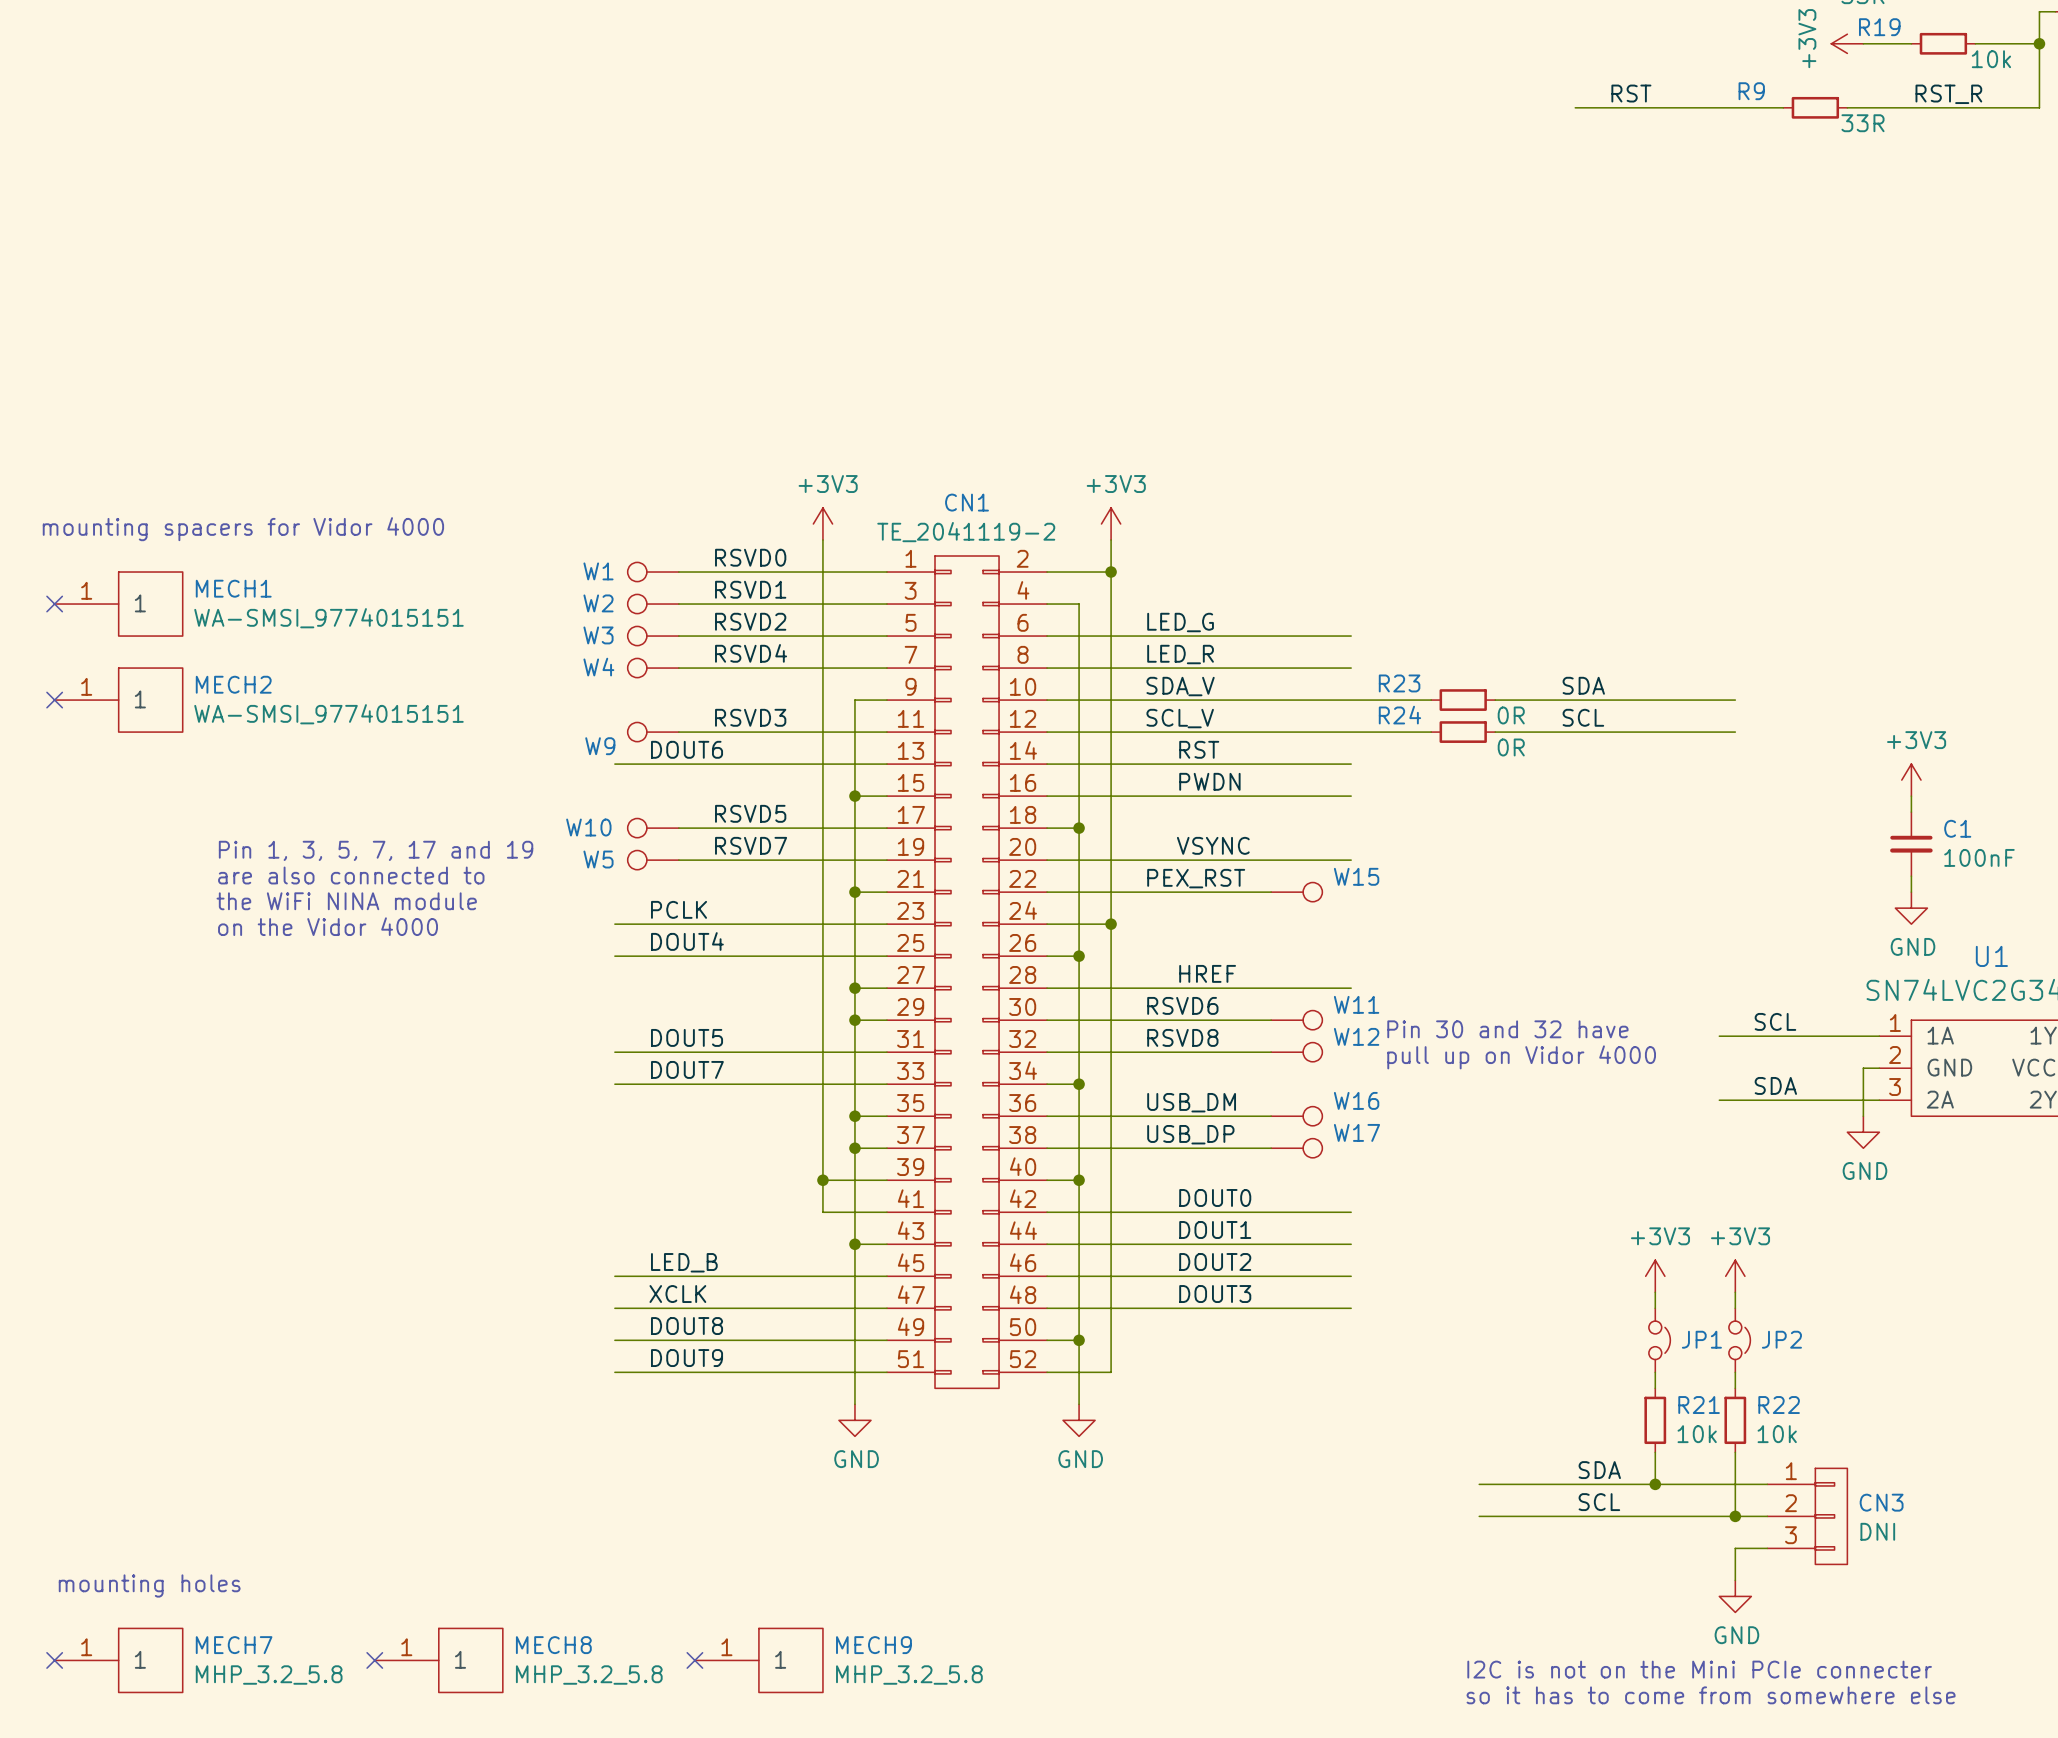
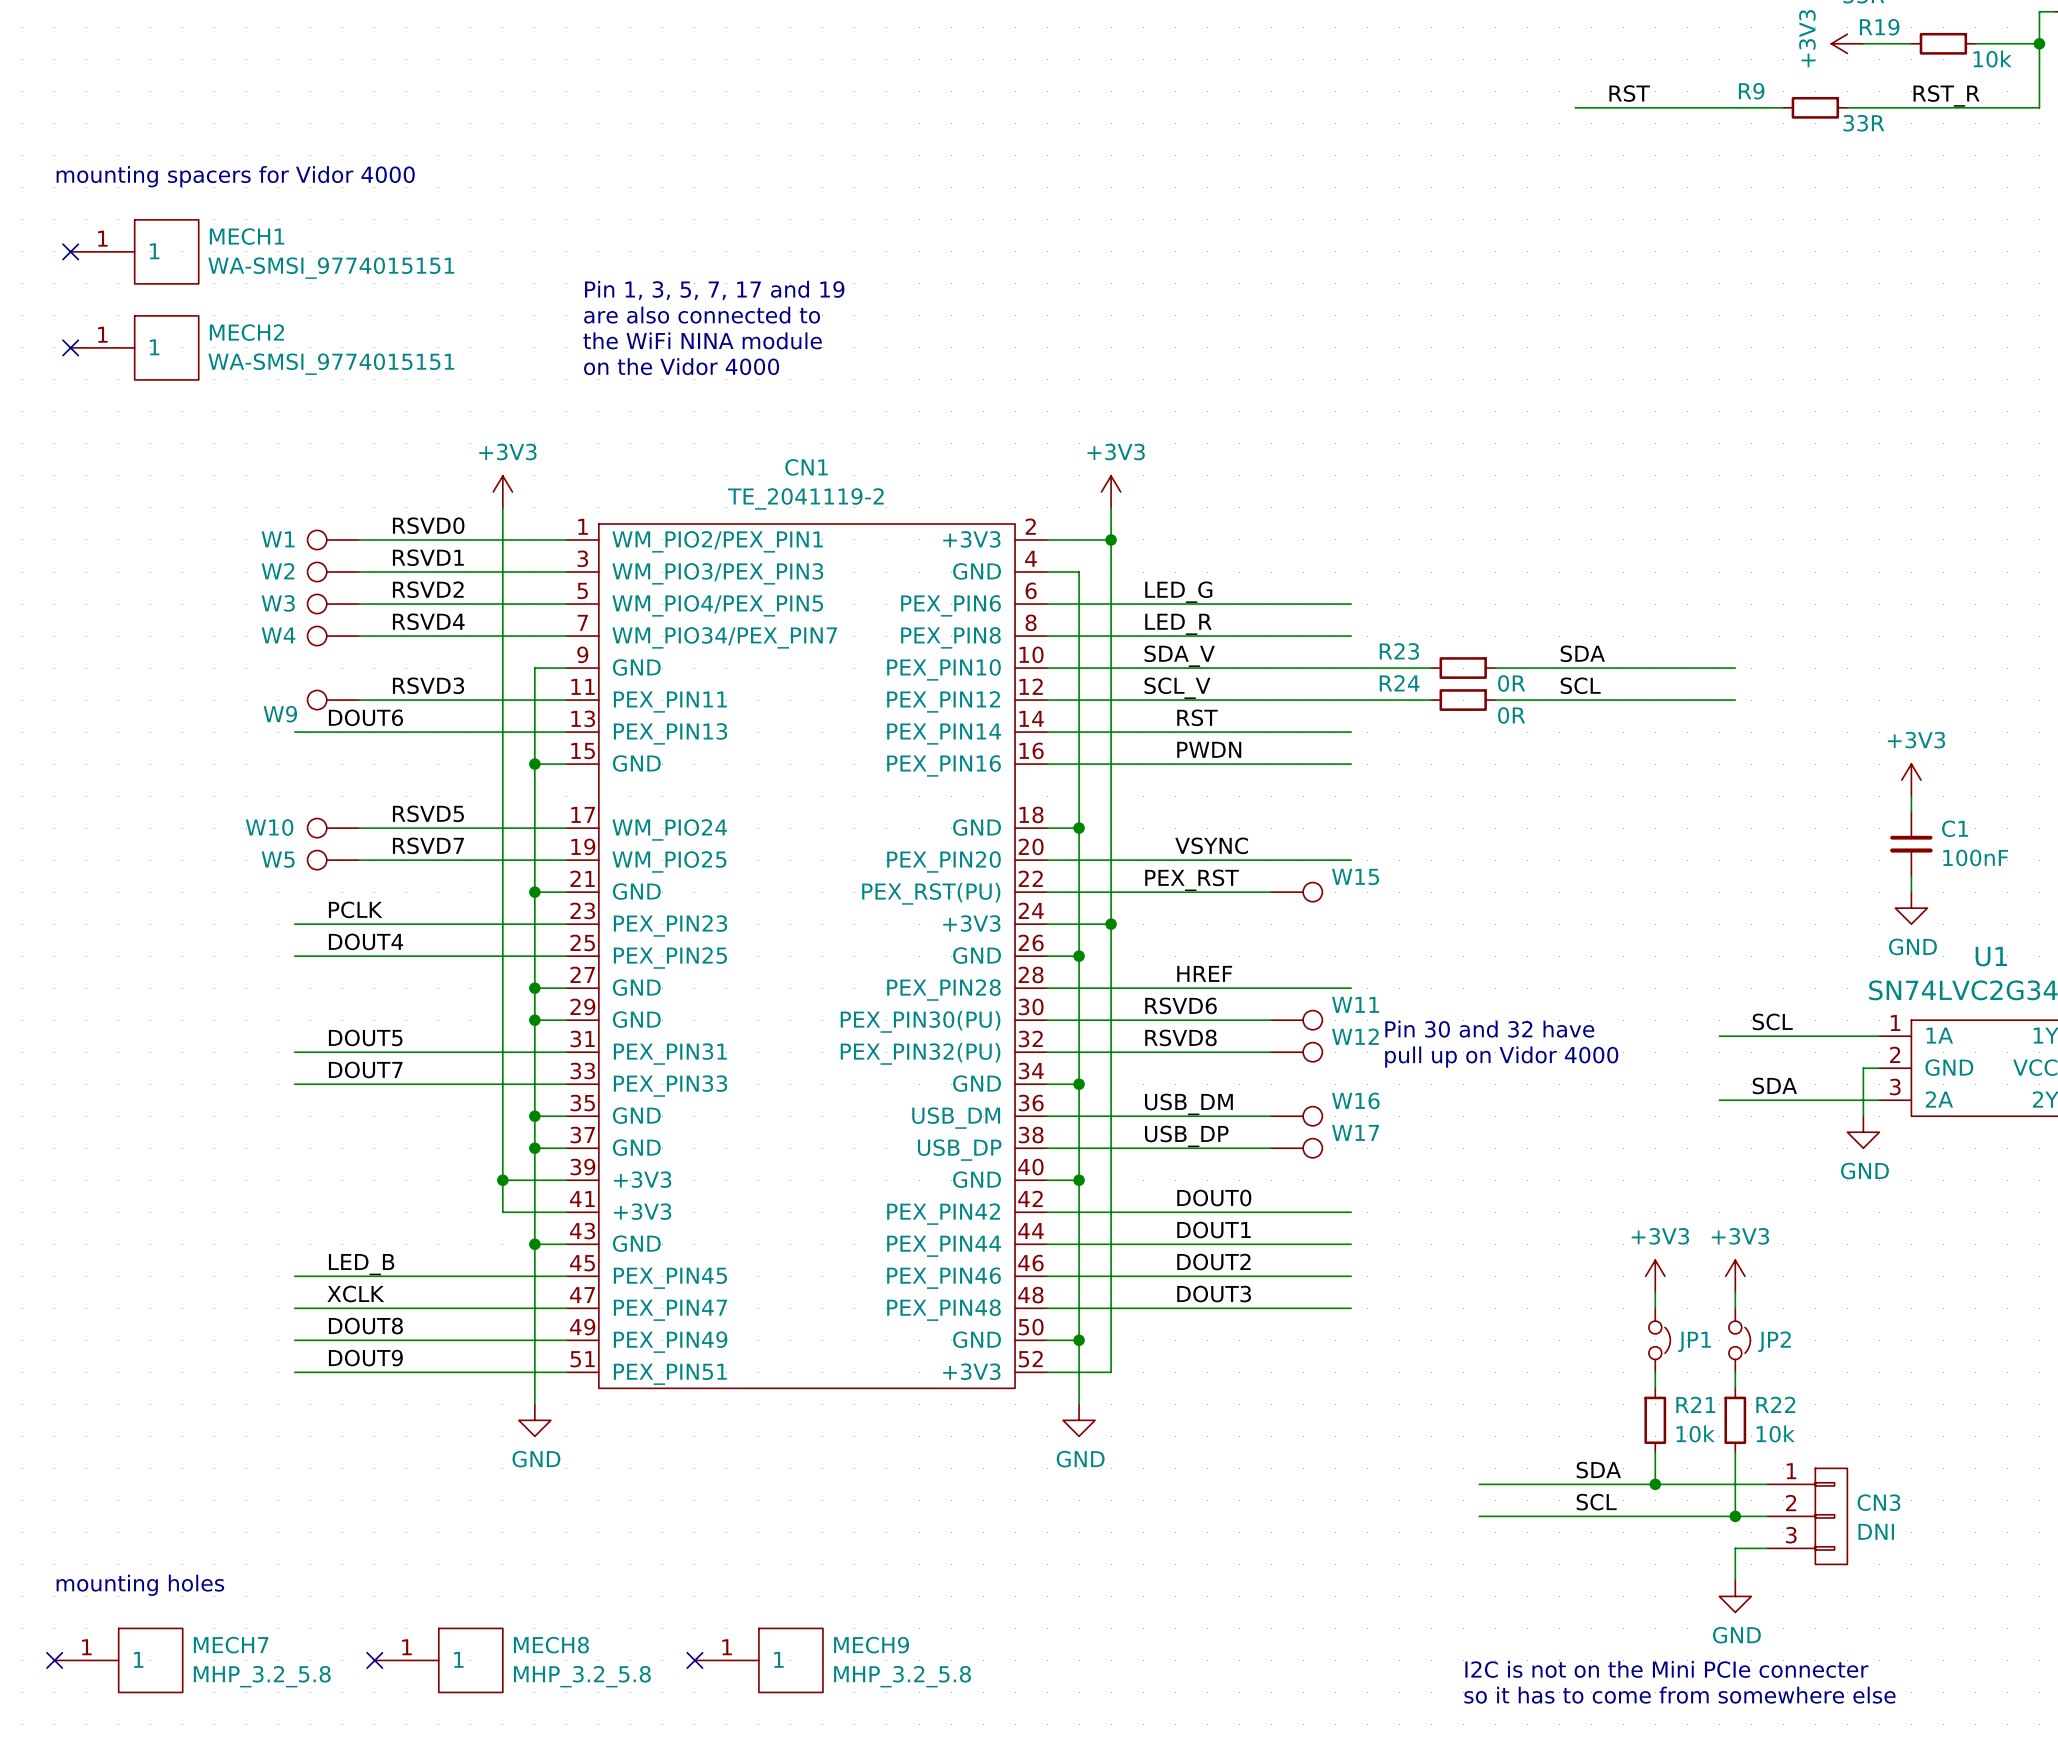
text: none -> mounting spacers for Vidor 4000 (235, 176)
no-connect mark: none -> (70, 251)
text: none -> Pin 1, 3, 5, 7, 17 and 19 (714, 290)
text: none -> are also connected to (702, 315)
text: none -> the WiFi NINA module (702, 340)
no-connect mark: none -> (70, 347)
text: none -> on the Vidor 4000 (681, 366)
power symbol: none -> +3V3 (502, 491)
wire: none -> (502, 507) (502, 1212) (566, 1212)
wire: none -> (1111, 507) (1111, 539) (1047, 539)
power symbol: +3V3 (822, 523) -> none
power symbol position: +3V3 (1111, 523) -> +3V3 (1111, 491)
label: none -> RSVD0 (428, 525)
text: mounting spacers for Vidor 4000 (243, 529) -> none
wire: none -> (358, 539) (566, 539)
wire: (822, 539) (822, 1212) (886, 1212) -> none
CN1 symbol: [886, 556, 1048, 1389] -> [566, 523, 1048, 1389]
label: none -> RSVD1 (428, 557)
label: RSVD0 (750, 557) -> none
wire: none -> (358, 572) (566, 572)
W1 position: (653, 572) -> (333, 539)
wire: (678, 572) (886, 572) -> none
wire: (1079, 572) (1111, 572) -> (1079, 572) (1079, 604) (1351, 604)
junction position: (1111, 572) -> (1111, 539)
label: none -> RSVD2 (428, 589)
label: RSVD1 (750, 589) -> none
label: none -> LED_G (1178, 592)
no-connect mark: (54, 604) -> none
MECH1 position: (118, 604) -> (134, 251)
wire: none -> (358, 604) (566, 604)
W2 position: (653, 604) -> (333, 572)
wire: (678, 604) (886, 604) -> none
label: none -> RSVD4 (428, 621)
label: RSVD2 (750, 621) -> none
label: LED_G (1180, 622) -> LED_R (1178, 624)
wire: none -> (358, 636) (566, 636)
W3 position: (653, 636) -> (333, 604)
wire: (678, 636) (886, 636) -> none
label: RSVD4 (751, 653) -> none
label: none -> SDA (1582, 653)
label: LED_R (1180, 654) -> SDA_V (1179, 656)
wire: none -> (566, 668) (534, 668) (534, 1404)
W4 position: (653, 668) -> (333, 636)
wire: (678, 668) (886, 668) -> none
R23: none -> 0R (1463, 668)
R23 name: R23 (1399, 683) -> R24 (1399, 683)
label: none -> RSVD3 (428, 685)
label: SDA (1583, 685) -> SCL (1580, 685)
label: SDA_V (1180, 686) -> SCL_V (1177, 688)
no-connect mark: (54, 700) -> none
MECH2 position: (118, 700) -> (134, 347)
wire: none -> (358, 700) (566, 700)
wire: (886, 700) (854, 700) (854, 1404) -> none
label: none -> DOUT6 (365, 717)
label: RSVD3 (750, 717) -> none
label: none -> RST (1197, 717)
label: SCL (1583, 717) -> none
label: SCL_V (1180, 718) -> none
wire: none -> (294, 732) (566, 732)
W9 position: (653, 732) -> (333, 700)
wire: (678, 732) (886, 732) -> none
wire: (1351, 732) (1431, 732) -> (1351, 668) (1431, 668)
R24: 0R (1463, 732) -> none
wire: (1495, 732) (1735, 732) -> (1495, 668) (1735, 668)
label: DOUT6 (687, 749) -> none
label: RST (1199, 749) -> PWDN (1209, 749)
wire: none -> (534, 764) (566, 764)
junction: none -> (534, 764)
wire: (614, 764) (886, 764) -> none
label: PWDN (1209, 781) -> none
wire: (854, 796) (886, 796) -> none
junction: (854, 796) -> none
wire: (1047, 796) (1351, 796) -> none
label: none -> RSVD5 (428, 813)
label: RSVD5 (750, 813) -> none
wire: none -> (358, 828) (566, 828)
W10 position: (653, 828) -> (333, 828)
wire: (678, 828) (886, 828) -> none
label: none -> RSVD7 (428, 845)
label: RSVD7 (751, 845) -> none
text: Pin 1, 3, 5, 7, 17 and 19 (376, 850) -> none
wire: none -> (358, 860) (566, 860)
W5 position: (653, 860) -> (333, 860)
wire: (678, 860) (886, 860) -> none
text: are also connected to (351, 875) -> none
wire: none -> (534, 892) (566, 892)
junction: none -> (534, 892)
wire: (854, 892) (886, 892) -> none
junction: (854, 892) -> none
text: the WiFi NINA module (346, 901) -> none
label: none -> PCLK (355, 909)
label: PCLK (679, 909) -> none
wire: none -> (294, 924) (566, 924)
wire: (614, 924) (886, 924) -> none
text: on the Vidor 4000 (328, 926) -> none
label: none -> DOUT4 (366, 941)
label: DOUT4 (687, 941) -> none
wire: none -> (294, 956) (566, 956)
wire: (614, 956) (886, 956) -> none
wire: none -> (534, 988) (566, 988)
junction: none -> (534, 988)
wire: (854, 988) (886, 988) -> none
junction: (854, 988) -> none
wire: none -> (534, 1020) (566, 1020)
junction: none -> (534, 1020)
wire: (854, 1020) (886, 1020) -> none
junction: (854, 1020) -> none
label: none -> DOUT5 (365, 1037)
label: DOUT5 (687, 1037) -> none
wire: none -> (294, 1052) (566, 1052)
wire: (614, 1052) (886, 1052) -> none
label: none -> DOUT7 (365, 1069)
label: DOUT7 (687, 1069) -> none
wire: none -> (294, 1084) (566, 1084)
wire: (614, 1084) (886, 1084) -> none
wire: none -> (534, 1116) (566, 1116)
junction: none -> (534, 1116)
wire: (854, 1116) (886, 1116) -> none
junction: (854, 1116) -> none
wire: none -> (534, 1148) (566, 1148)
junction: none -> (534, 1148)
wire: (854, 1148) (886, 1148) -> none
junction: (854, 1148) -> none
wire: none -> (502, 1180) (566, 1180)
junction: none -> (502, 1180)
wire: (822, 1180) (886, 1180) -> none
junction: (822, 1180) -> none
wire: none -> (534, 1244) (566, 1244)
junction: none -> (534, 1244)
wire: (854, 1244) (886, 1244) -> none
junction: (854, 1244) -> none
label: none -> LED_B (361, 1264)
label: LED_B (684, 1262) -> none
wire: none -> (294, 1276) (566, 1276)
wire: (614, 1276) (886, 1276) -> none
label: none -> XCLK (355, 1294)
label: XCLK (677, 1294) -> none
wire: none -> (294, 1308) (566, 1308)
wire: (614, 1308) (886, 1308) -> none
label: none -> DOUT8 (365, 1326)
label: DOUT8 (687, 1326) -> none
wire: none -> (294, 1340) (566, 1340)
wire: (614, 1340) (886, 1340) -> none
label: none -> DOUT9 (365, 1358)
label: DOUT9 (687, 1358) -> none
wire: none -> (294, 1372) (566, 1372)
wire: (614, 1372) (886, 1372) -> none
power symbol: none -> GND (534, 1420)
power symbol: GND (854, 1420) -> none

